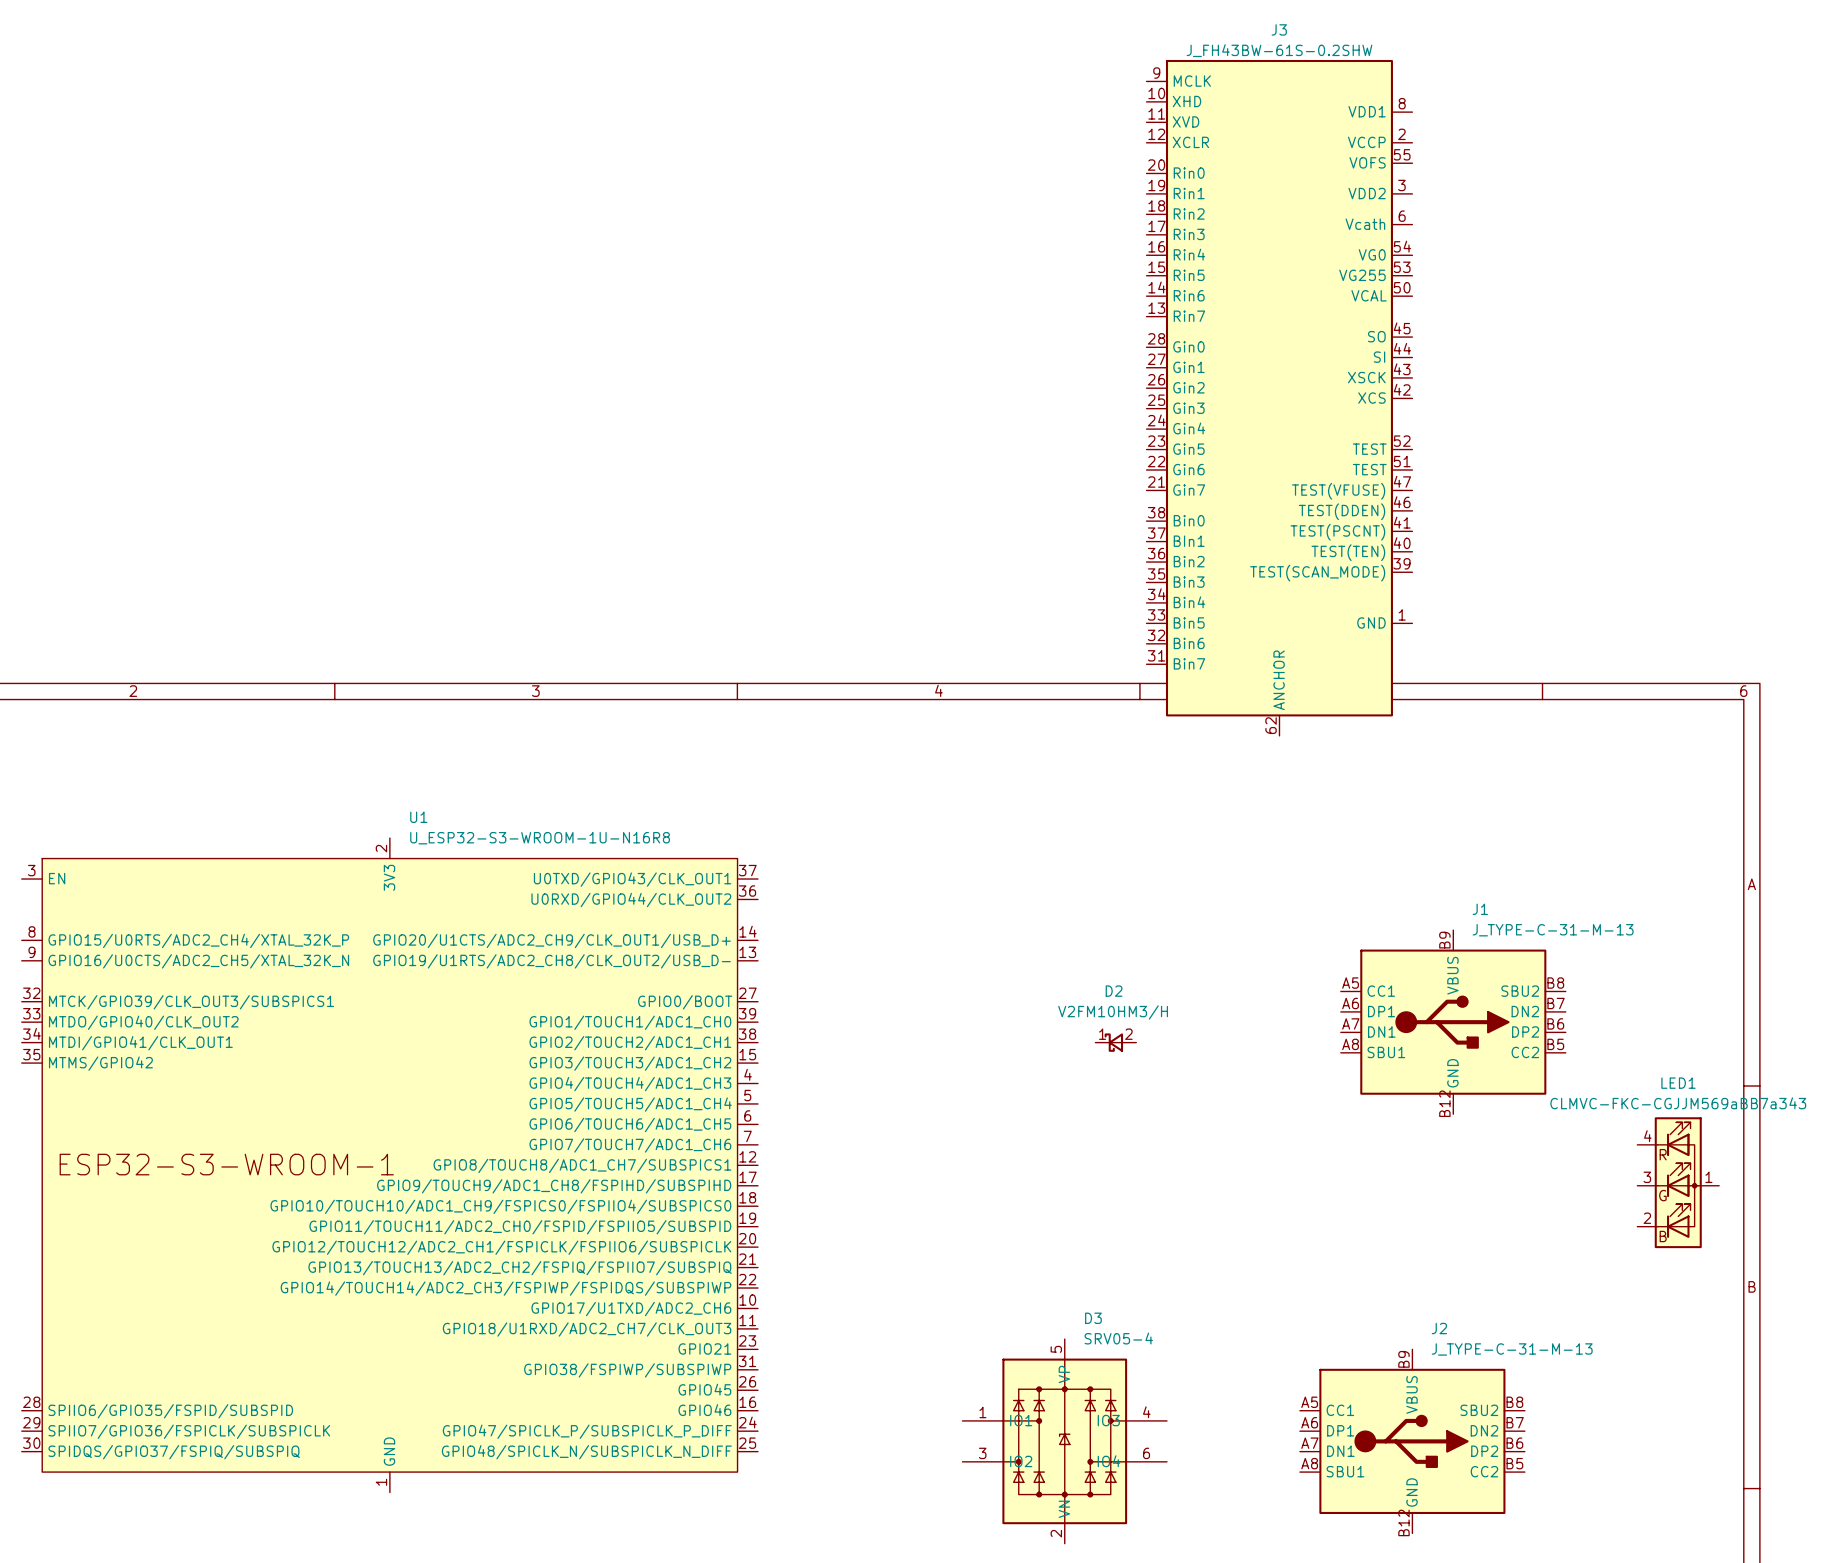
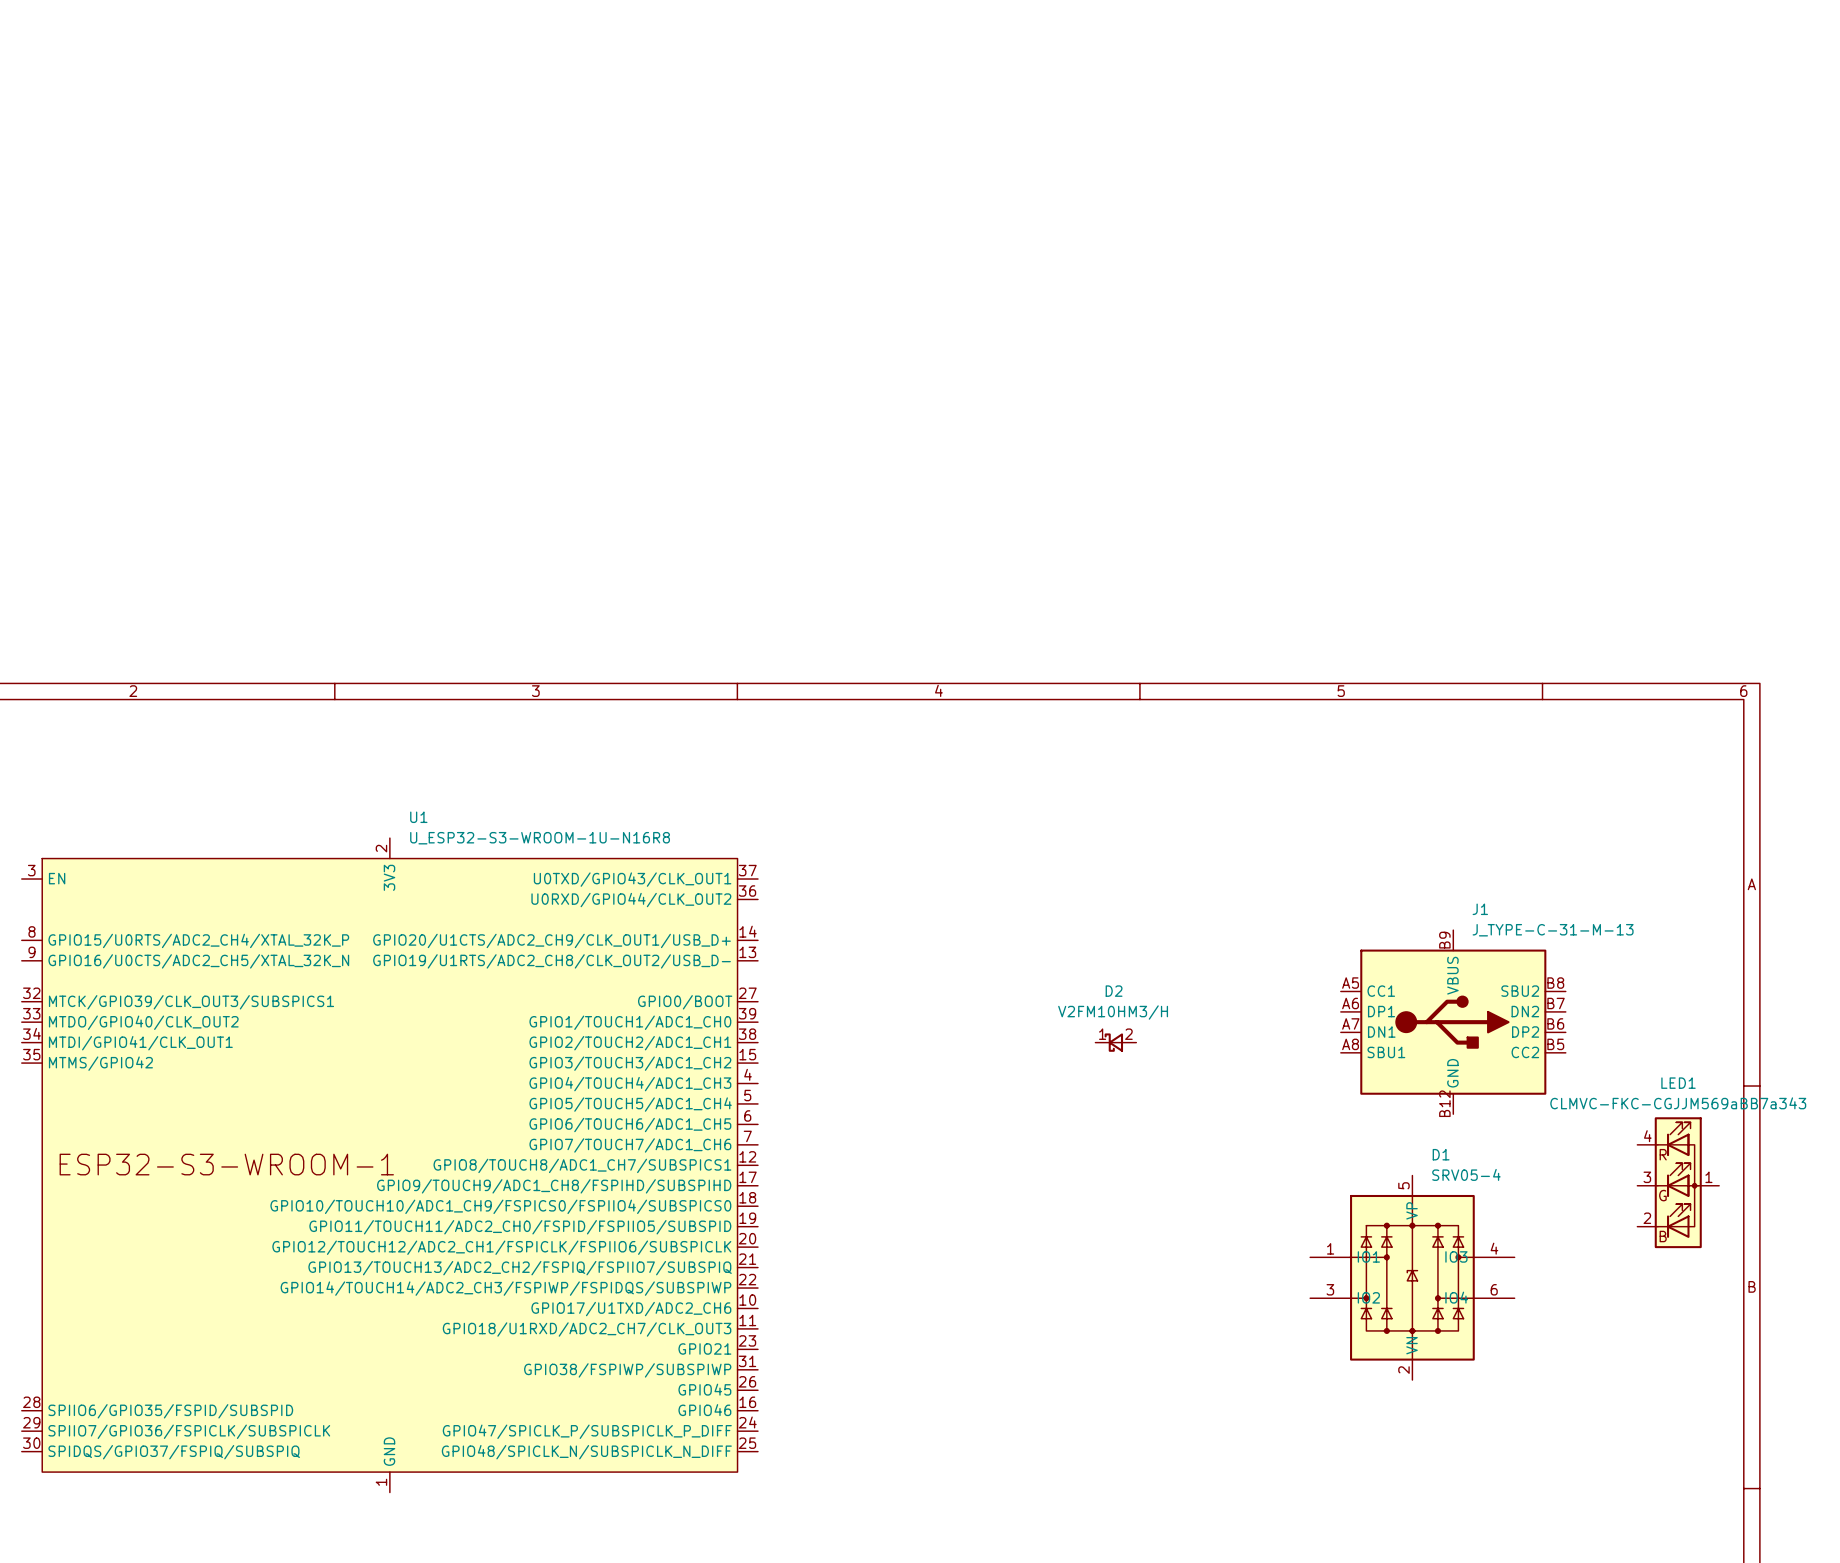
J3: (1279, 397) -> none
D1: none -> (1412, 1277)
D3: (1064, 1441) -> none
J2: (1412, 1441) -> none

